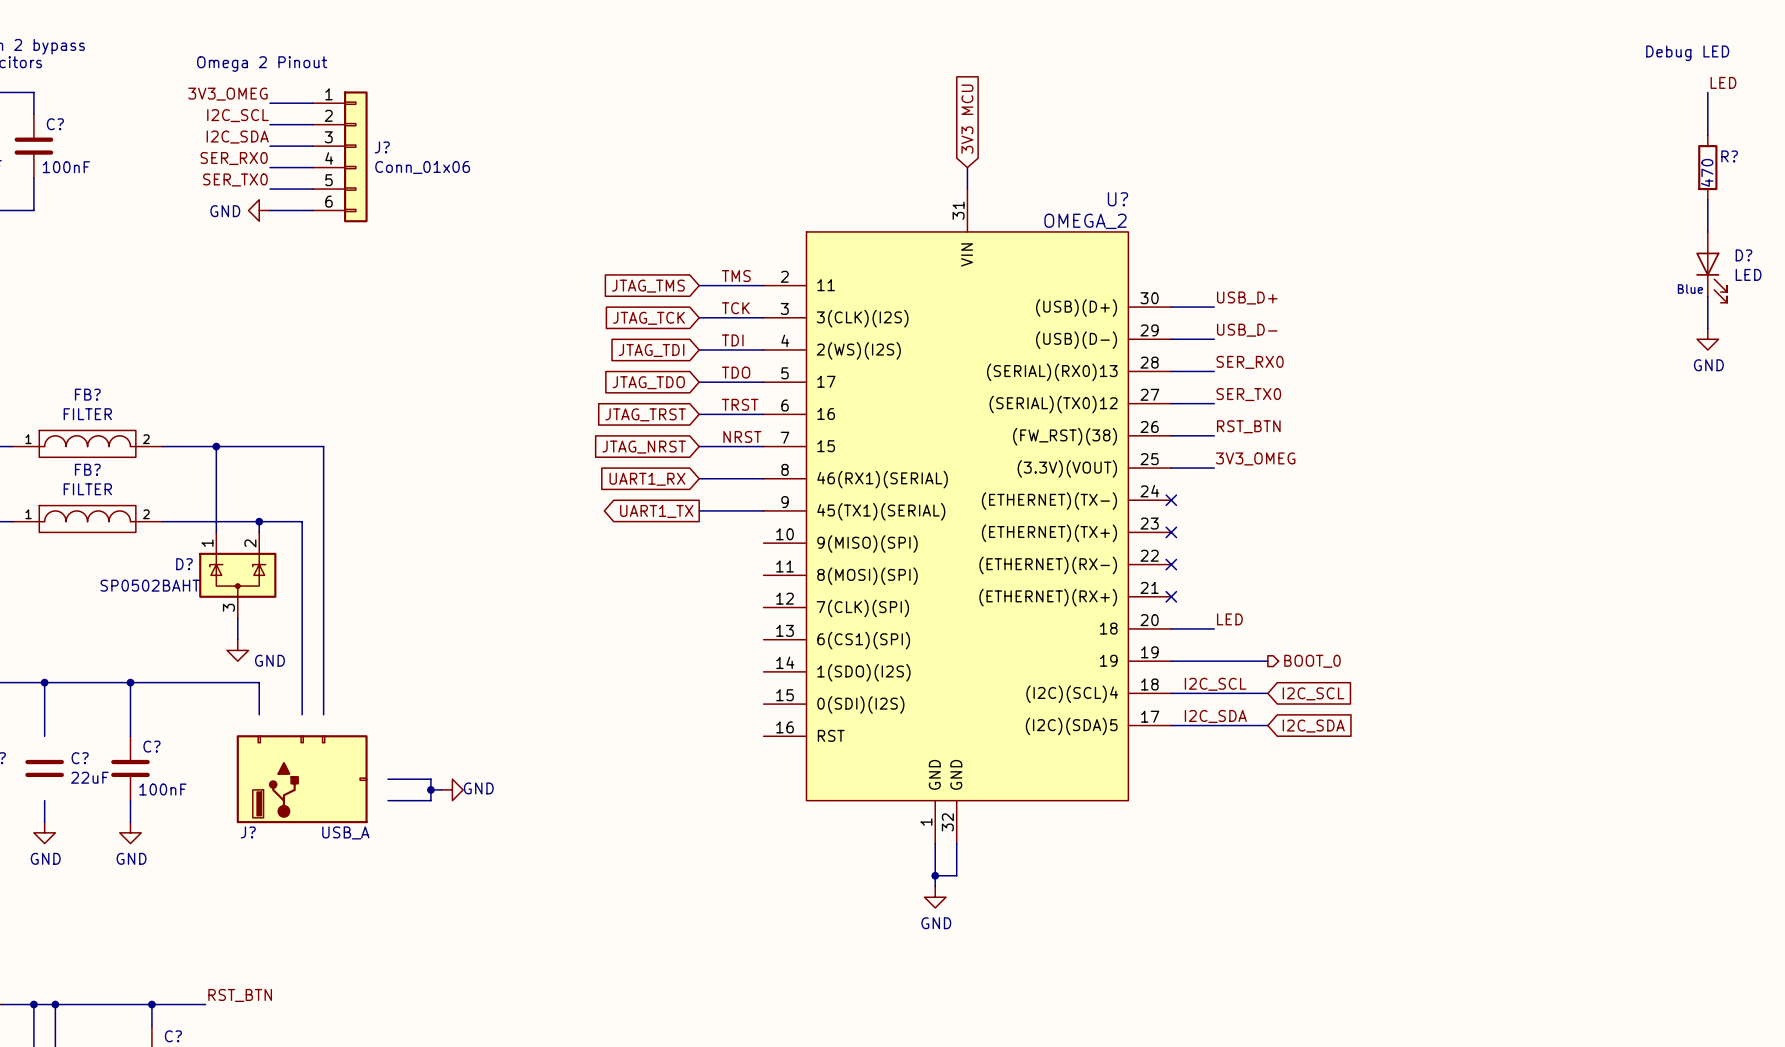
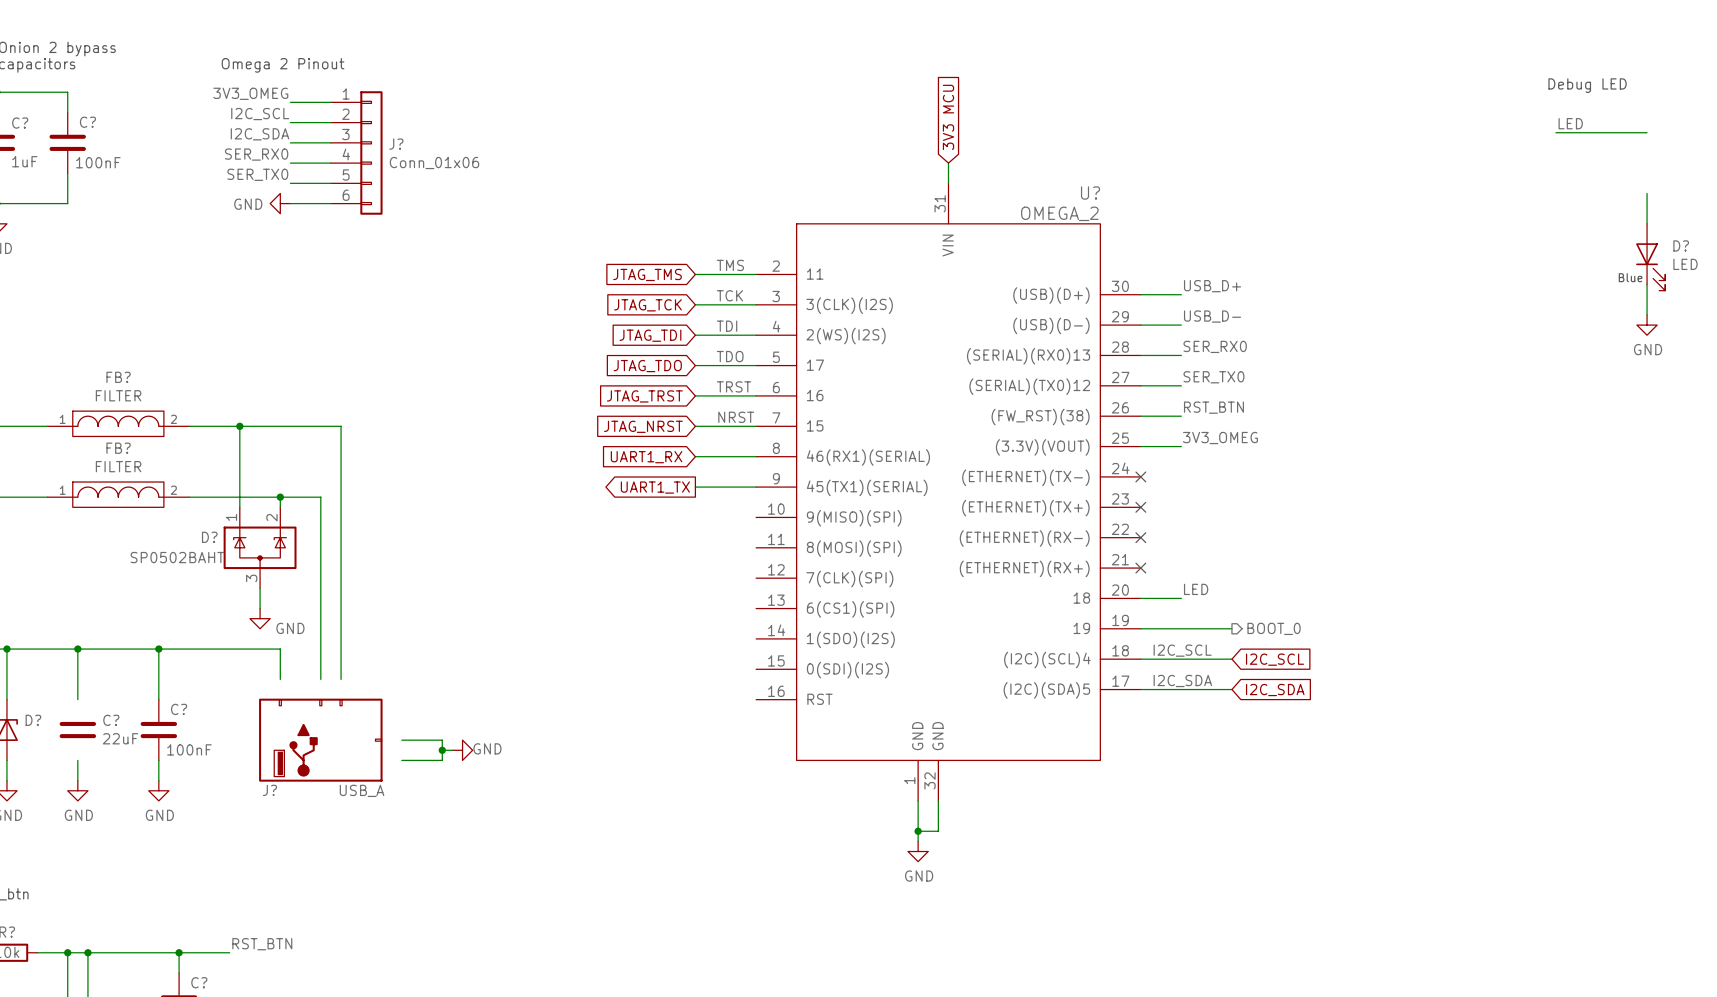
text position: Debug LED (1687, 53) -> Debug LED (1587, 85)
label position: LED (1723, 82) -> LED (1570, 123)
wire: (1707, 92) (1707, 135) -> (1555, 132) (1647, 132)
R?: 470 (1707, 167) -> none

